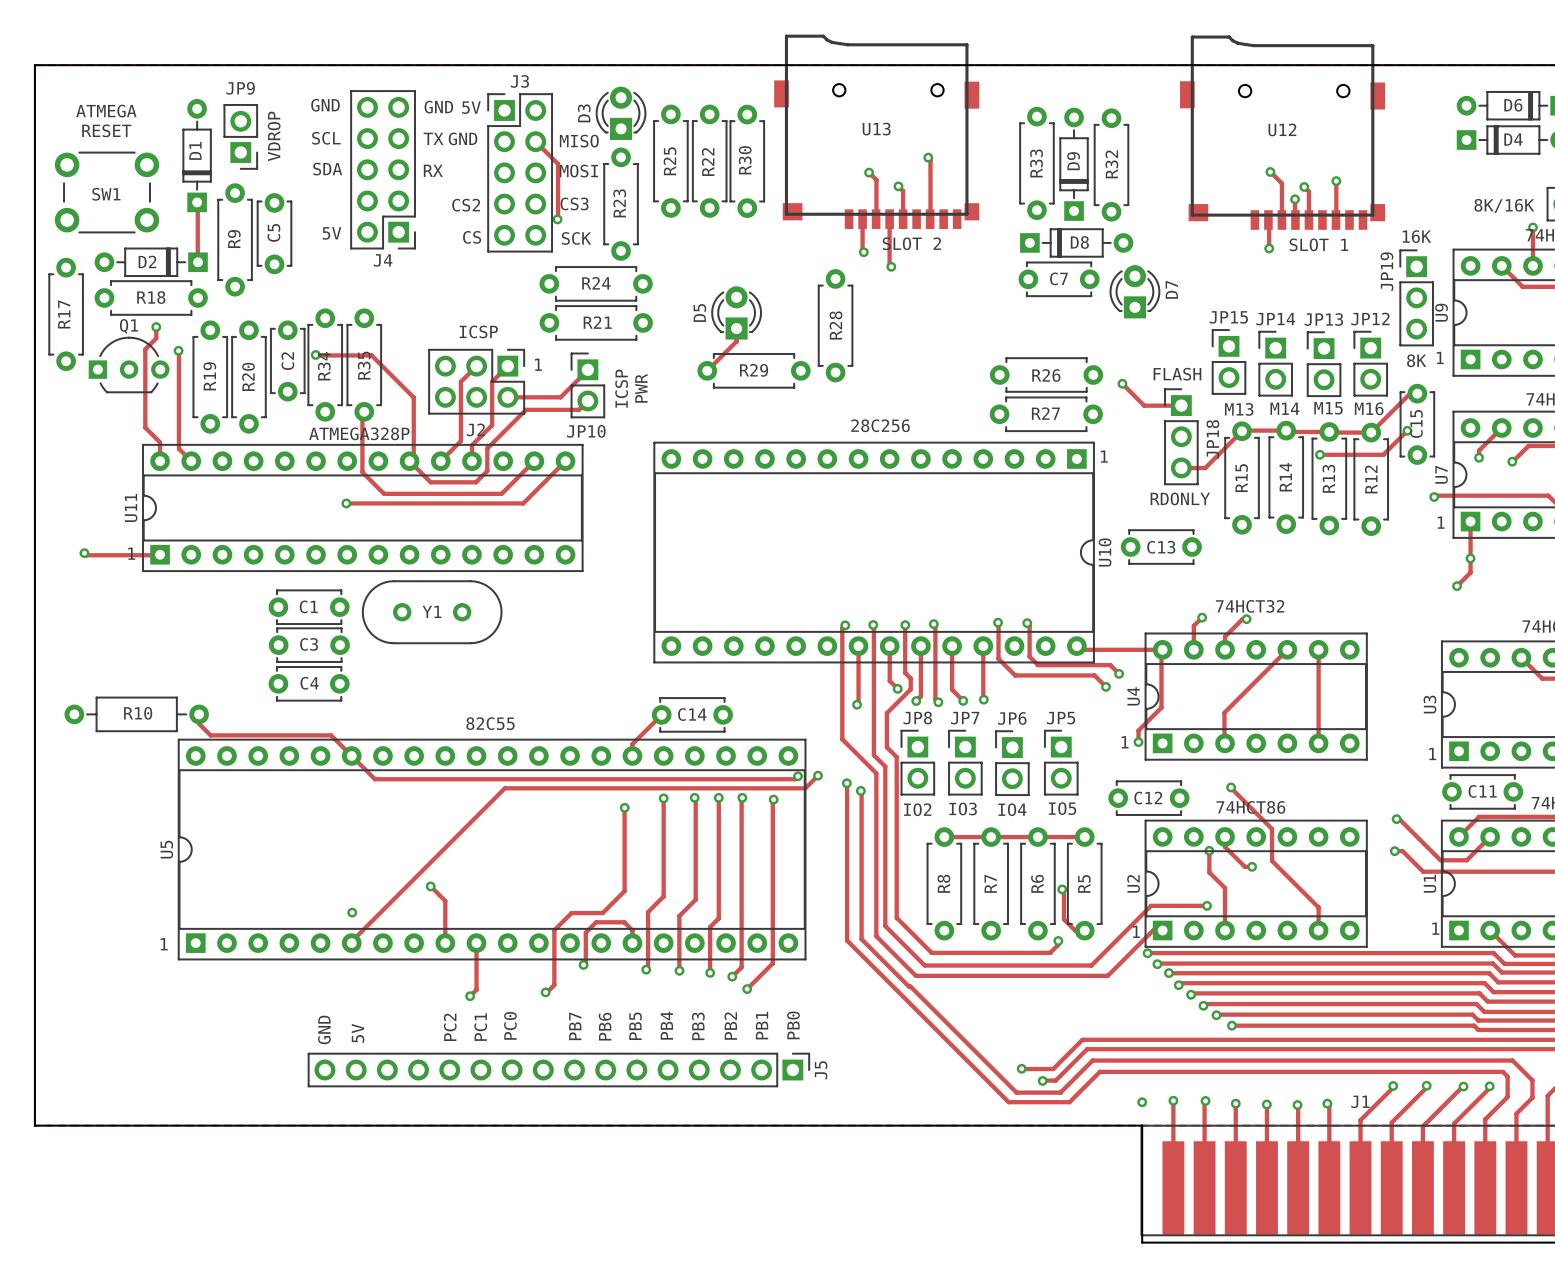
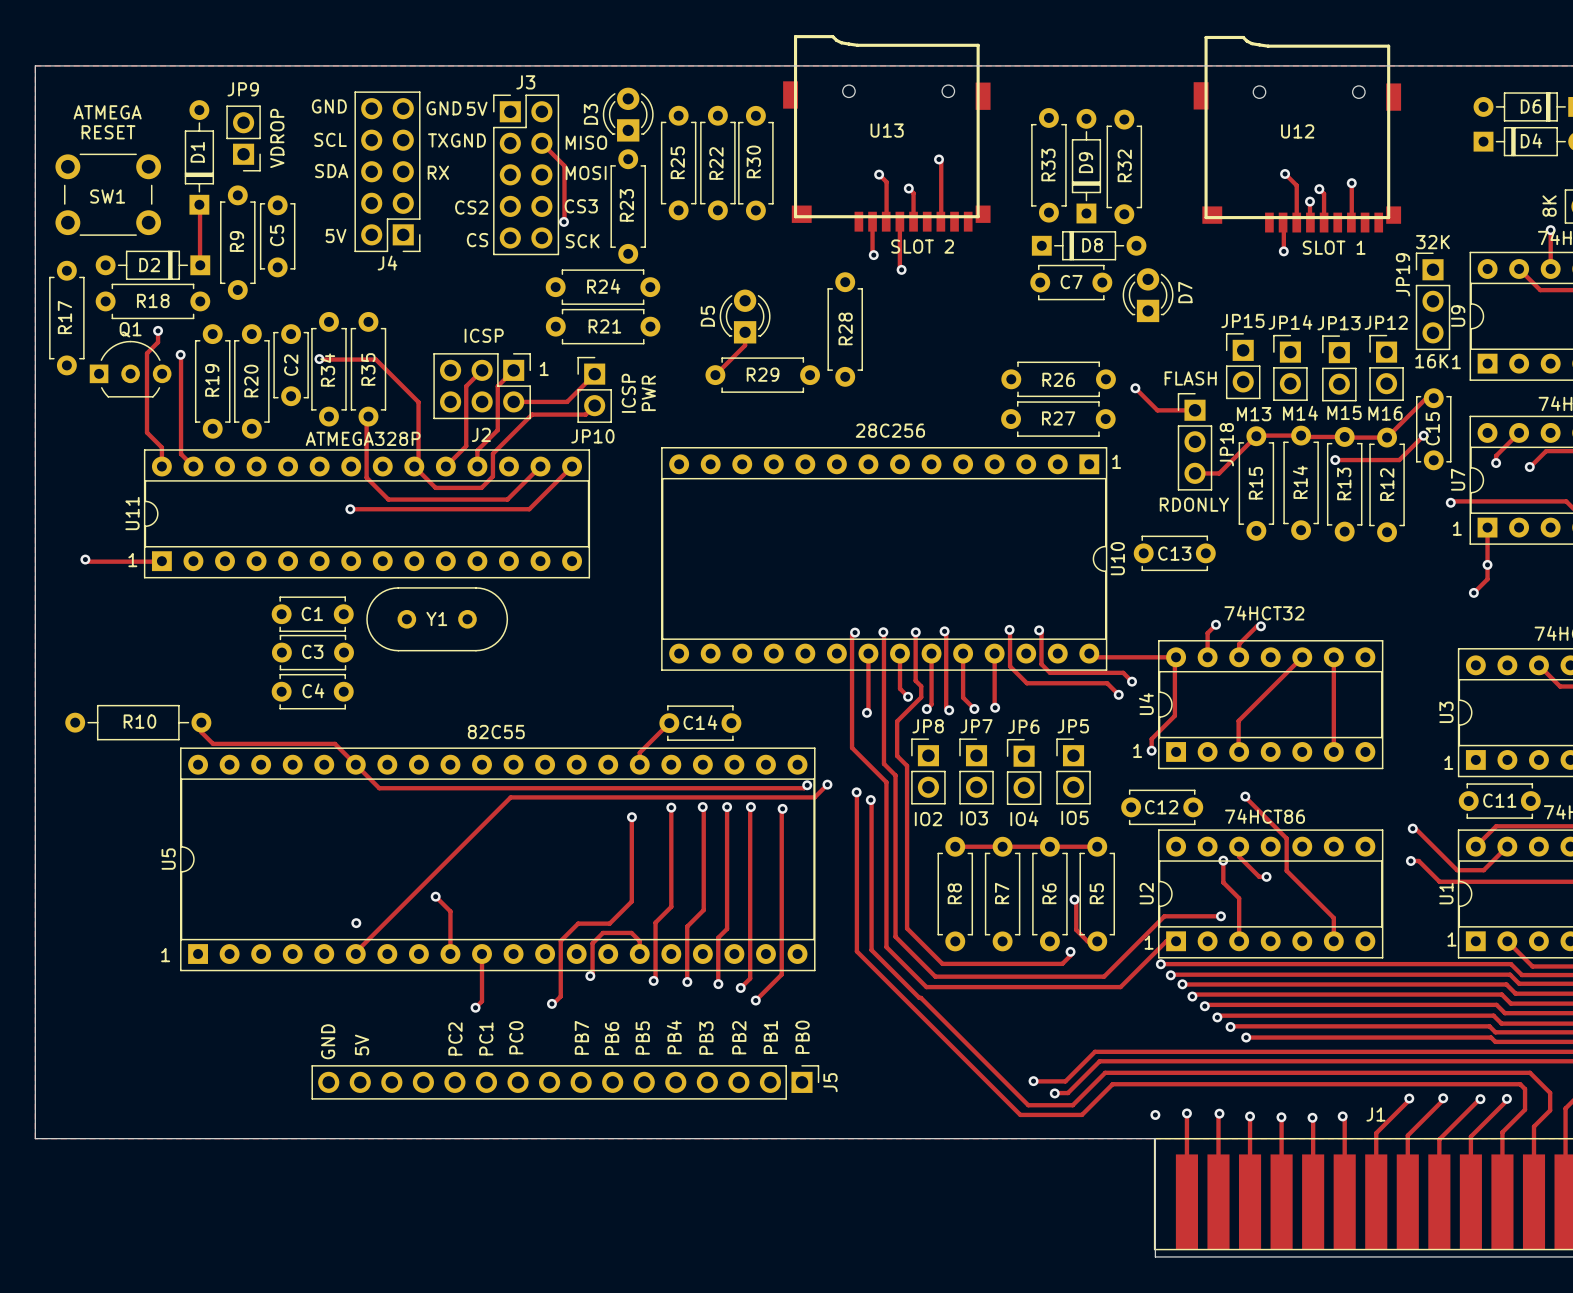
text: none -> 8K (1549, 206)
text: 8K/16K (1504, 205) -> none
text: 16K (1416, 236) -> 32K (1432, 242)
text: 8K (1416, 360) -> 16K (1431, 361)

